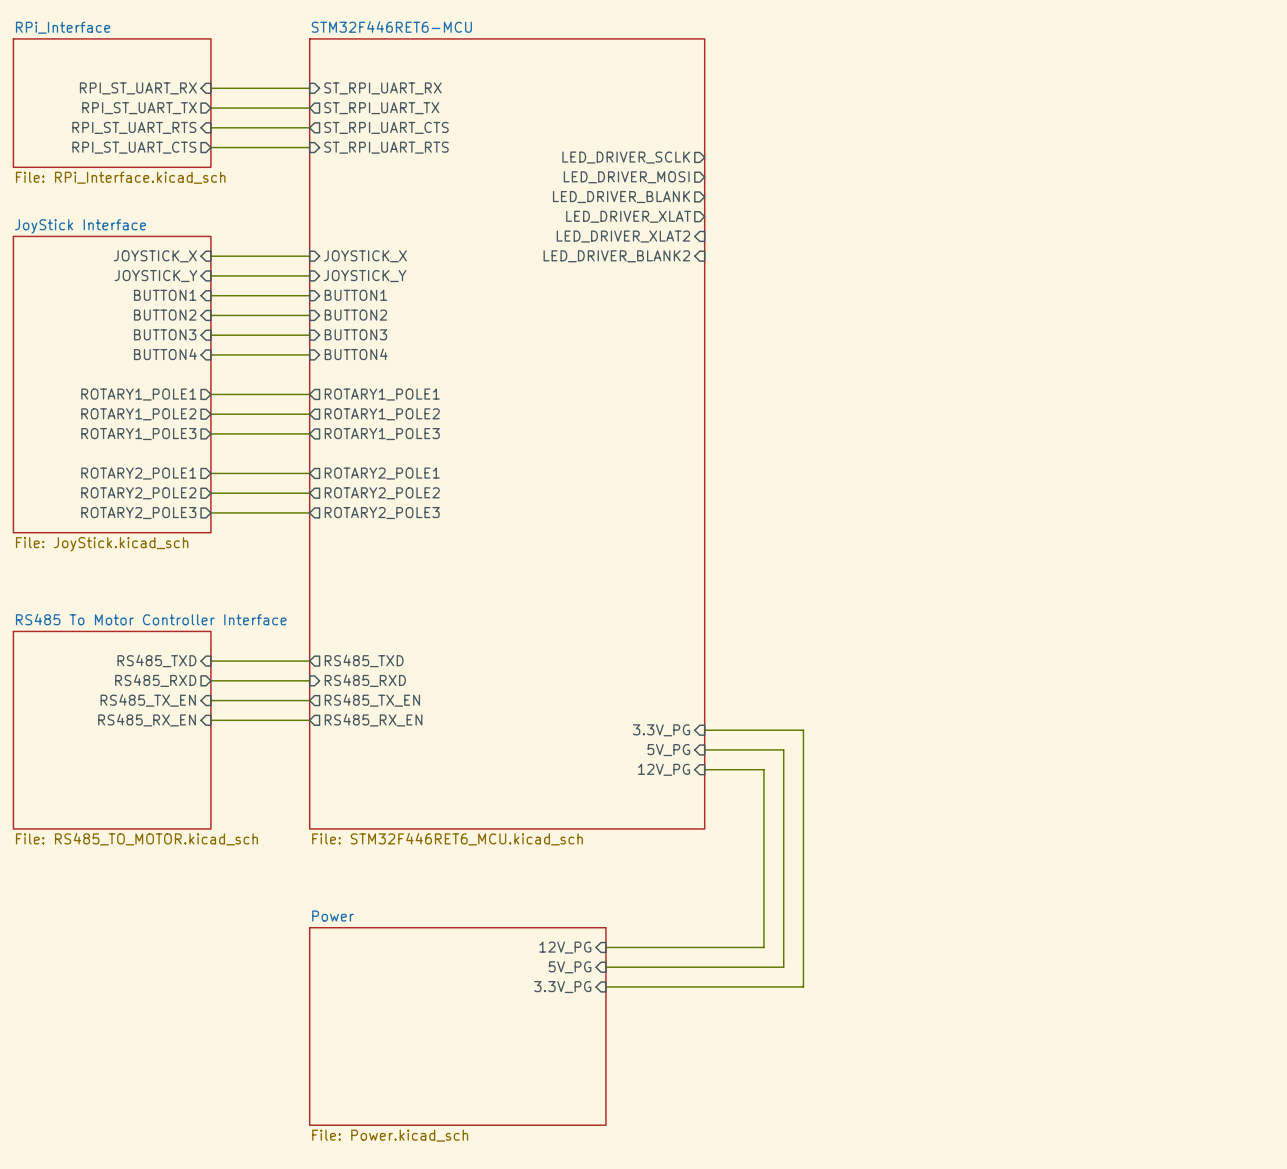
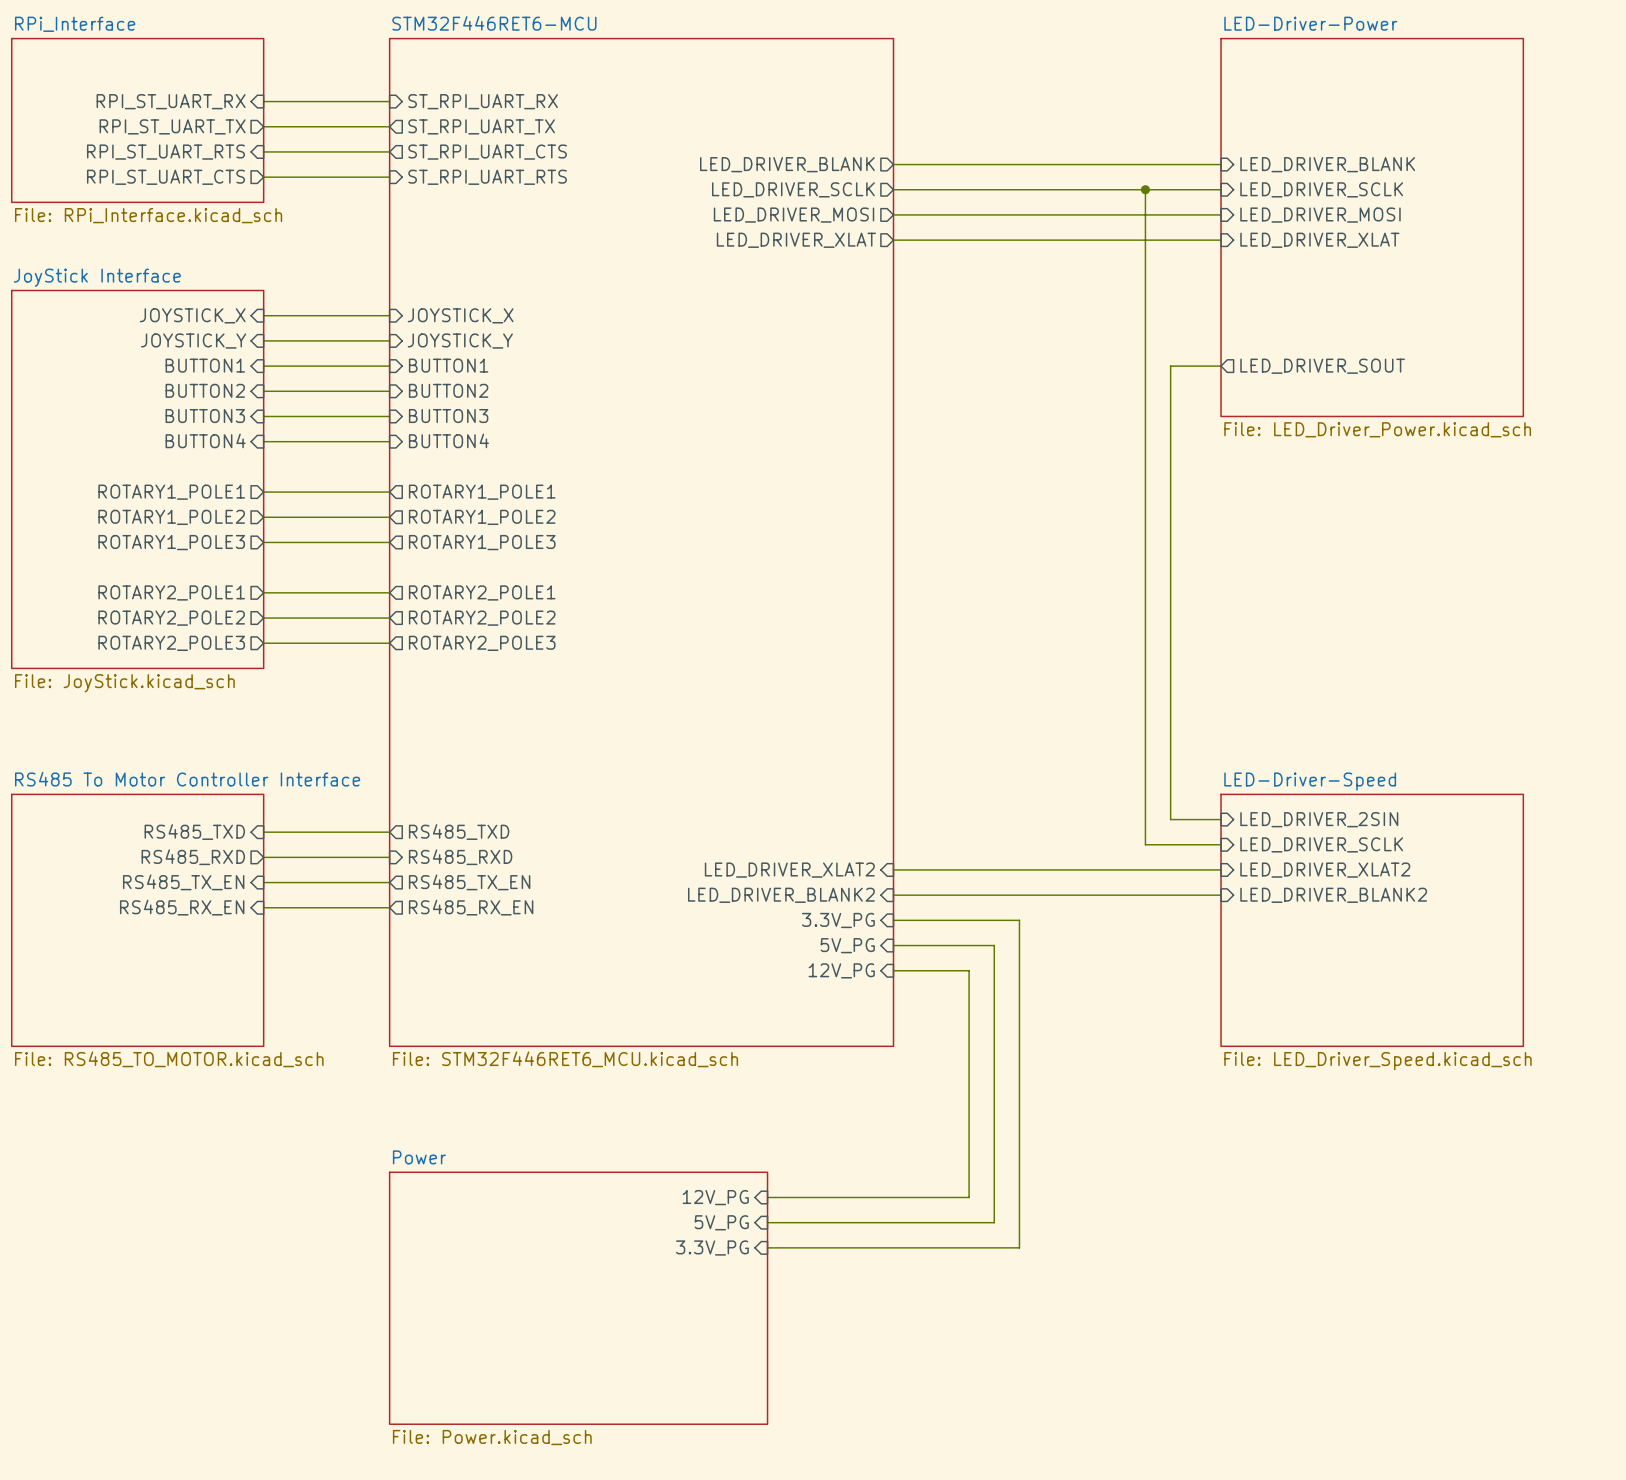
sheet pin: none -> LED_DRIVER_BLANK (787, 164)
wire: none -> (893, 164) (1221, 164)
sheet pin: none -> LED_DRIVER_BLANK (1327, 164)
wire: none -> (893, 189) (1221, 189)
wire: none -> (1145, 189) (1145, 844) (1221, 844)
junction: none -> (1145, 189)
sheet pin: none -> LED_DRIVER_SCLK (1321, 189)
wire: none -> (893, 214) (1221, 214)
sheet pin: none -> LED_DRIVER_MOSI (1320, 215)
sheet LED-Driver-Power: none -> File: LED_Driver_Power.kicad_sch (1372, 227)
wire: none -> (893, 240) (1221, 240)
sheet pin: LED_DRIVER_BLANK (621, 197) -> LED_DRIVER_XLAT (796, 240)
sheet pin: none -> LED_DRIVER_XLAT (1319, 240)
sheet pin: LED_DRIVER_XLAT (628, 216) -> none
sheet pin: LED_DRIVER_XLAT2 (623, 236) -> none
sheet pin: LED_DRIVER_BLANK2 (616, 256) -> none
wire: none -> (1221, 366) (1170, 366) (1170, 819) (1221, 819)
sheet pin: none -> LED_DRIVER_SOUT (1322, 366)
sheet pin: none -> LED_DRIVER_2SIN (1319, 819)
sheet pin: none -> LED_DRIVER_SCLK (1321, 844)
sheet pin: none -> LED_DRIVER_XLAT2 (789, 870)
wire: none -> (893, 869) (1221, 869)
sheet pin: none -> LED_DRIVER_XLAT2 (1325, 870)
sheet pin: none -> LED_DRIVER_BLANK2 (781, 895)
wire: none -> (893, 895) (1221, 895)
sheet pin: none -> LED_DRIVER_BLANK2 (1333, 895)
sheet LED-Driver-Speed: none -> File: LED_Driver_Speed.kicad_sch (1372, 920)

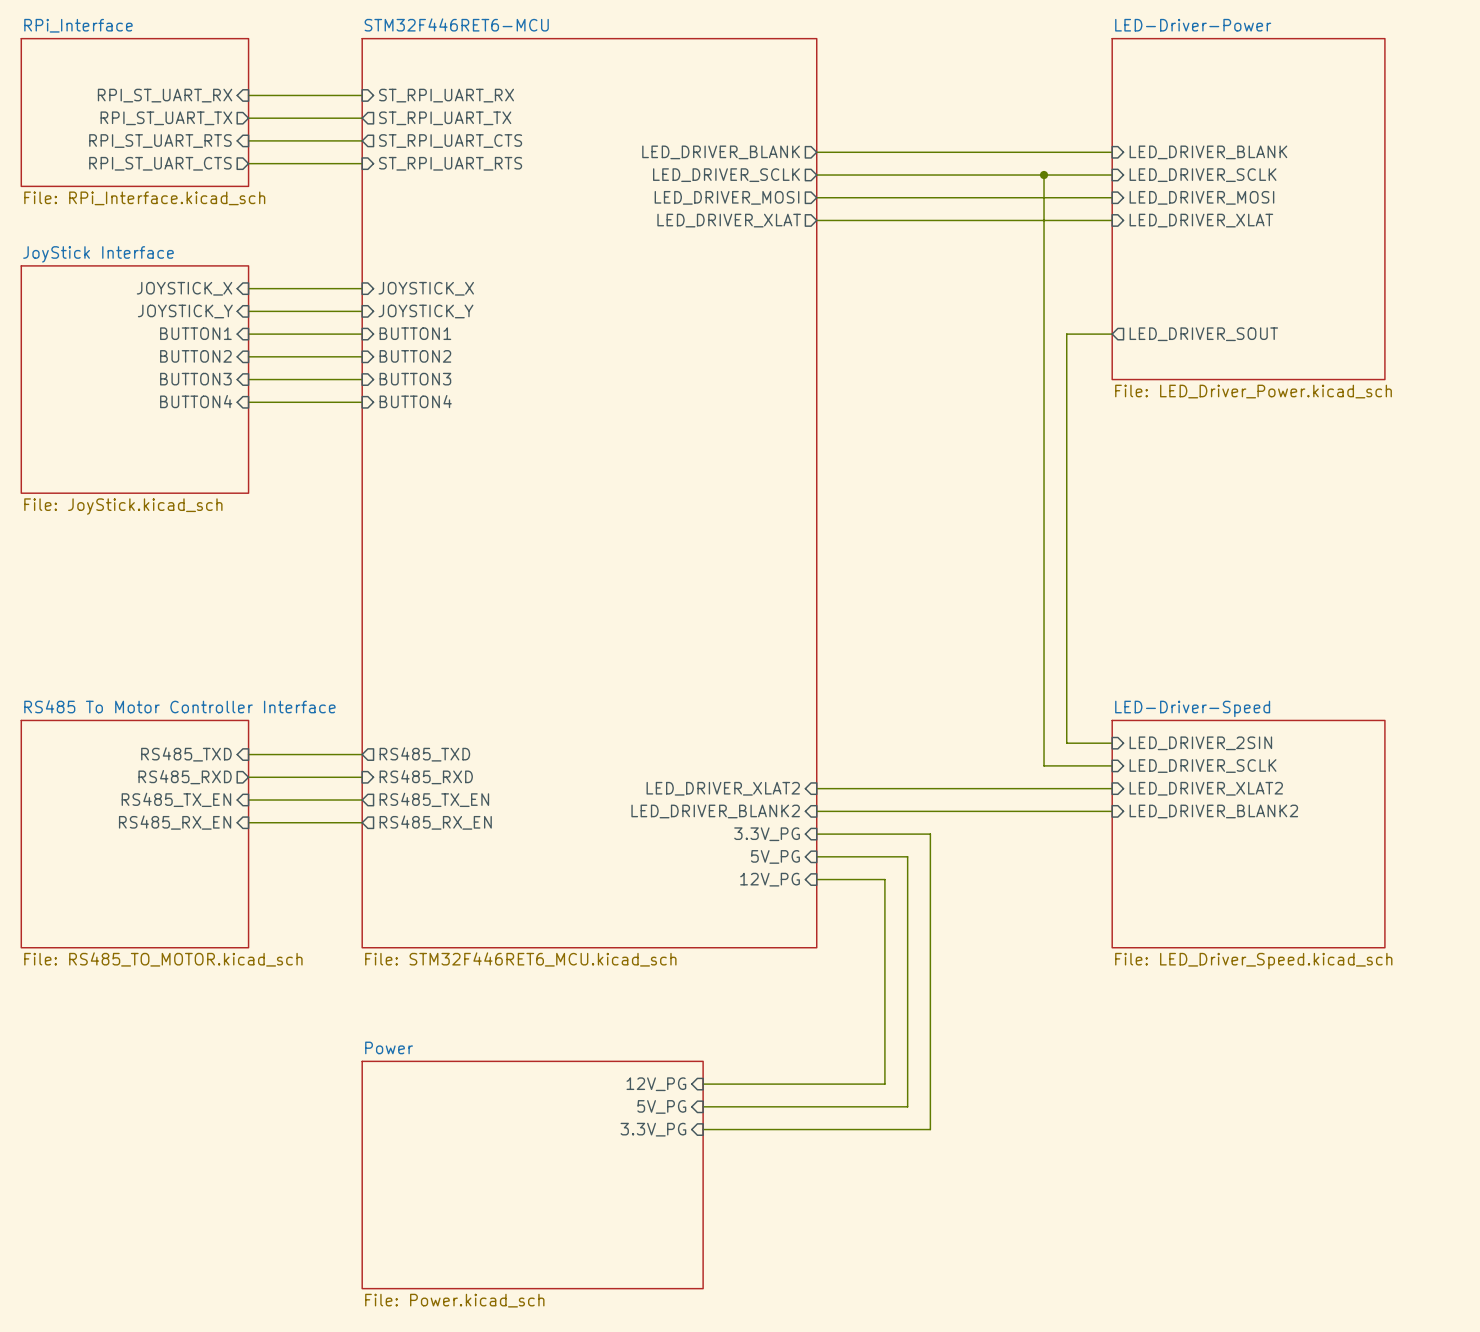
sheet JoyStick Interface: none -> File: JoyStick.kicad_sch (134, 379)
sheet JoyStick Interface: File: JoyStick.kicad_sch (137, 479) -> none
sheet pin: ROTARY1_POLE1 (171, 492) -> none
wire: (263, 492) (389, 492) -> none
sheet pin: ROTARY1_POLE1 (482, 492) -> none
sheet pin: ROTARY1_POLE2 (171, 517) -> none
wire: (263, 517) (389, 517) -> none
sheet pin: ROTARY1_POLE2 (482, 517) -> none
sheet pin: ROTARY1_POLE3 (171, 542) -> none
wire: (263, 542) (389, 542) -> none
sheet pin: ROTARY1_POLE3 (482, 542) -> none
sheet pin: ROTARY2_POLE1 (171, 592) -> none
wire: (263, 592) (389, 592) -> none
sheet pin: ROTARY2_POLE1 (482, 592) -> none
sheet pin: ROTARY2_POLE2 (171, 618) -> none
wire: (263, 618) (389, 618) -> none
sheet pin: ROTARY2_POLE2 (482, 618) -> none
sheet pin: ROTARY2_POLE3 (171, 643) -> none
wire: (263, 643) (389, 643) -> none
sheet pin: ROTARY2_POLE3 (482, 643) -> none

